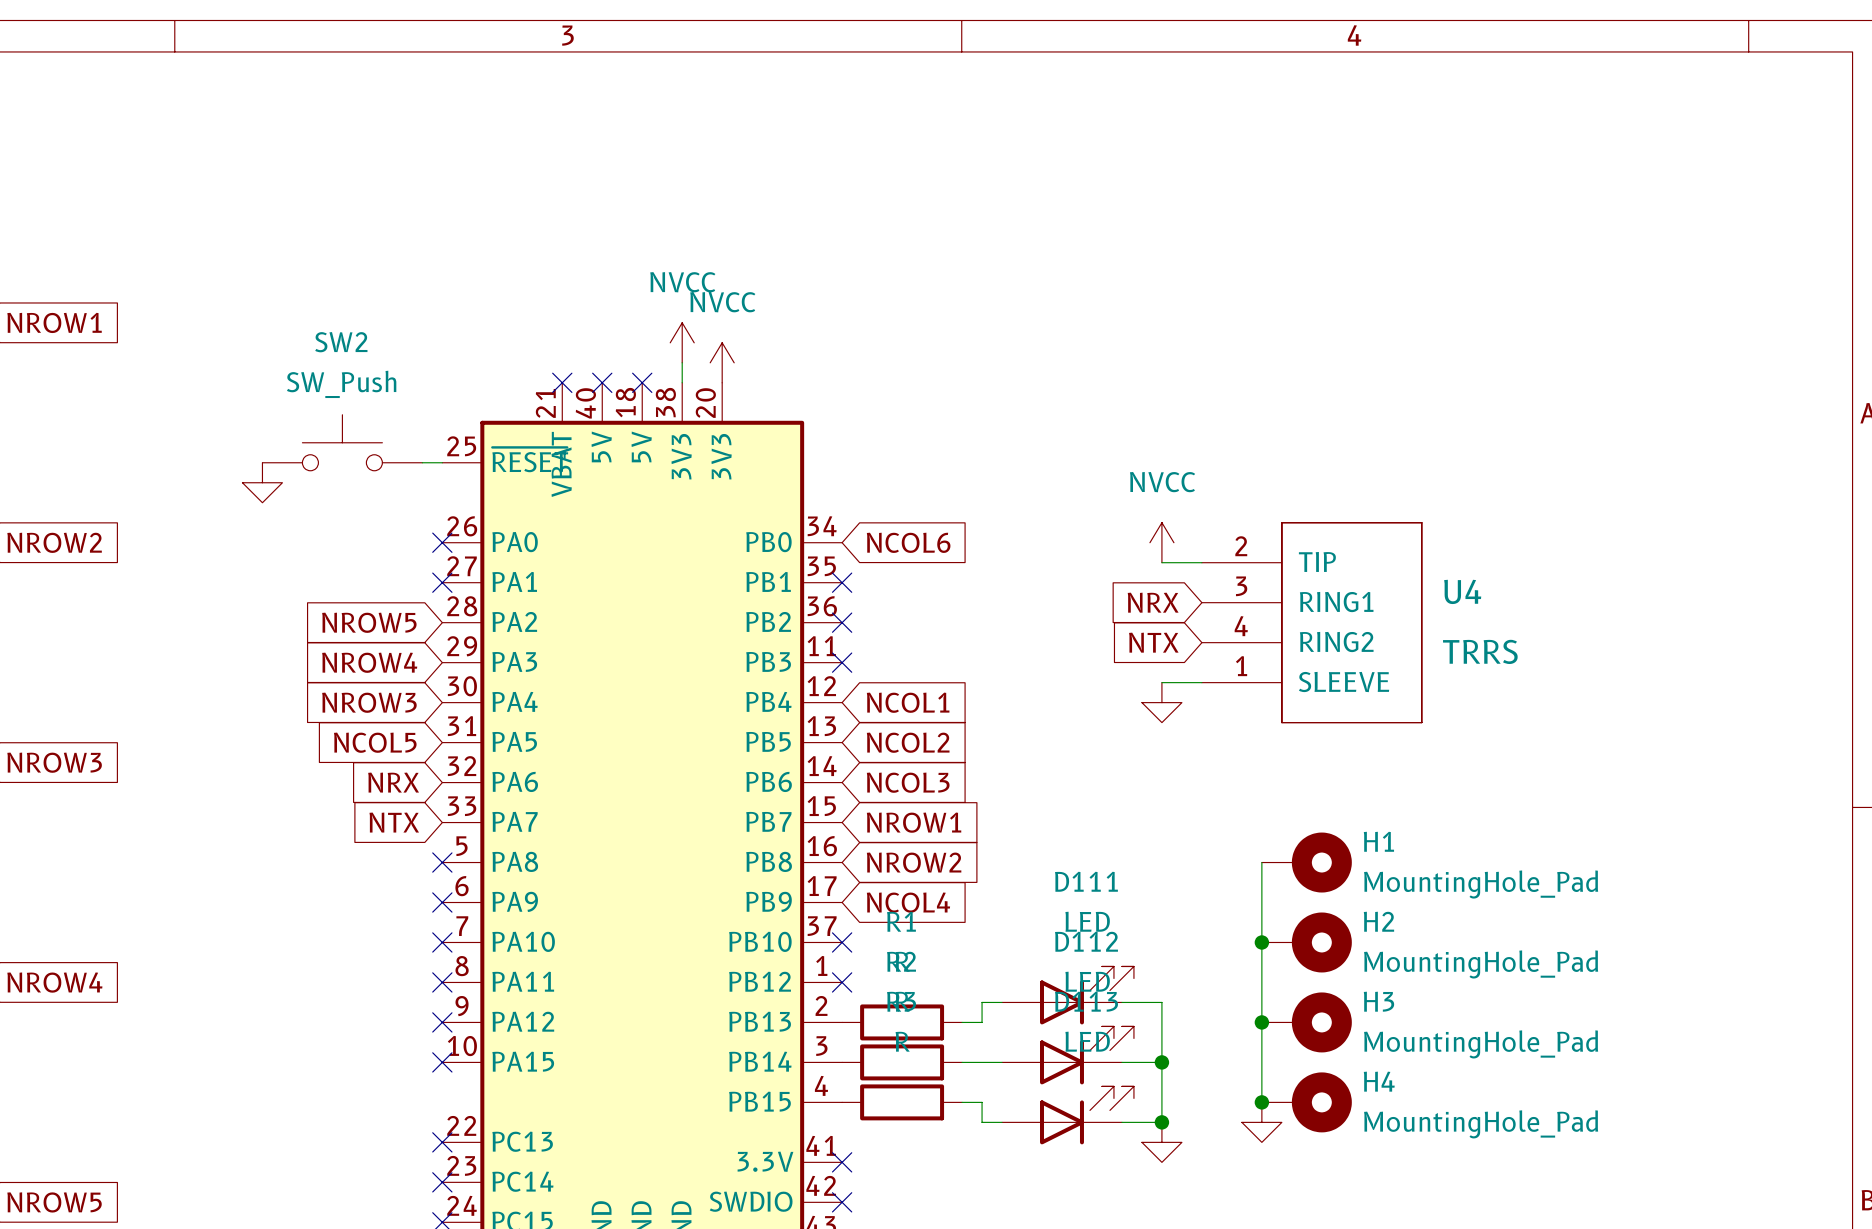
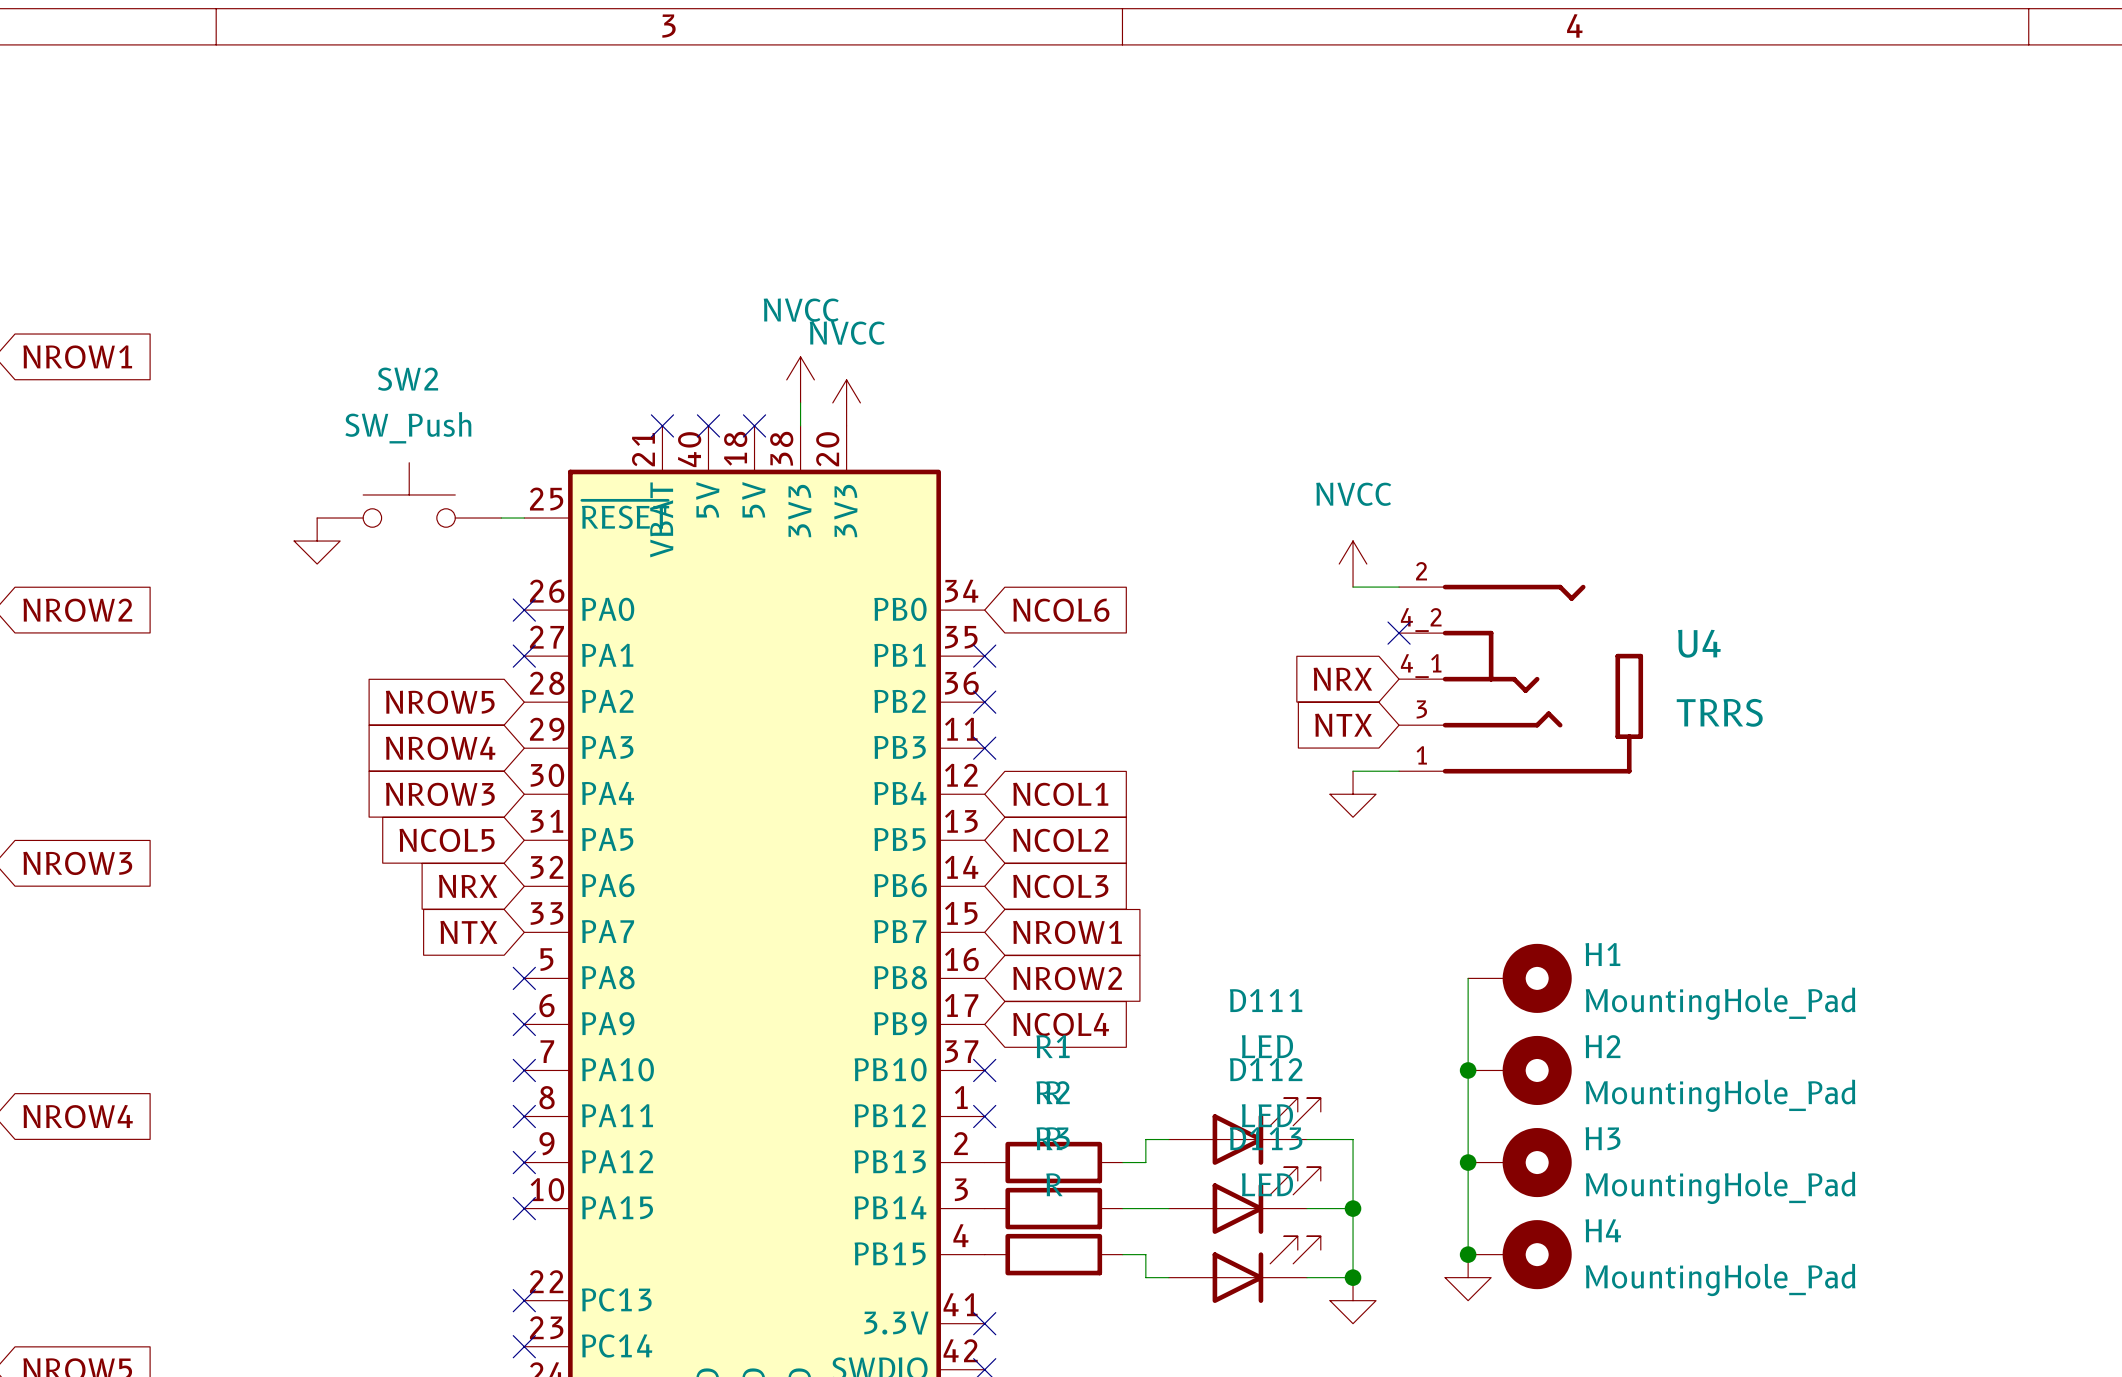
U4 symbol: [1201, 522, 1422, 723] -> [1399, 584, 1644, 774]
power symbol position: NVCC (1161, 542) -> NVCC (1353, 564)
wire: (1161, 562) (1201, 562) -> (1353, 587) (1399, 587)
no-connect mark: none -> (1399, 633)

